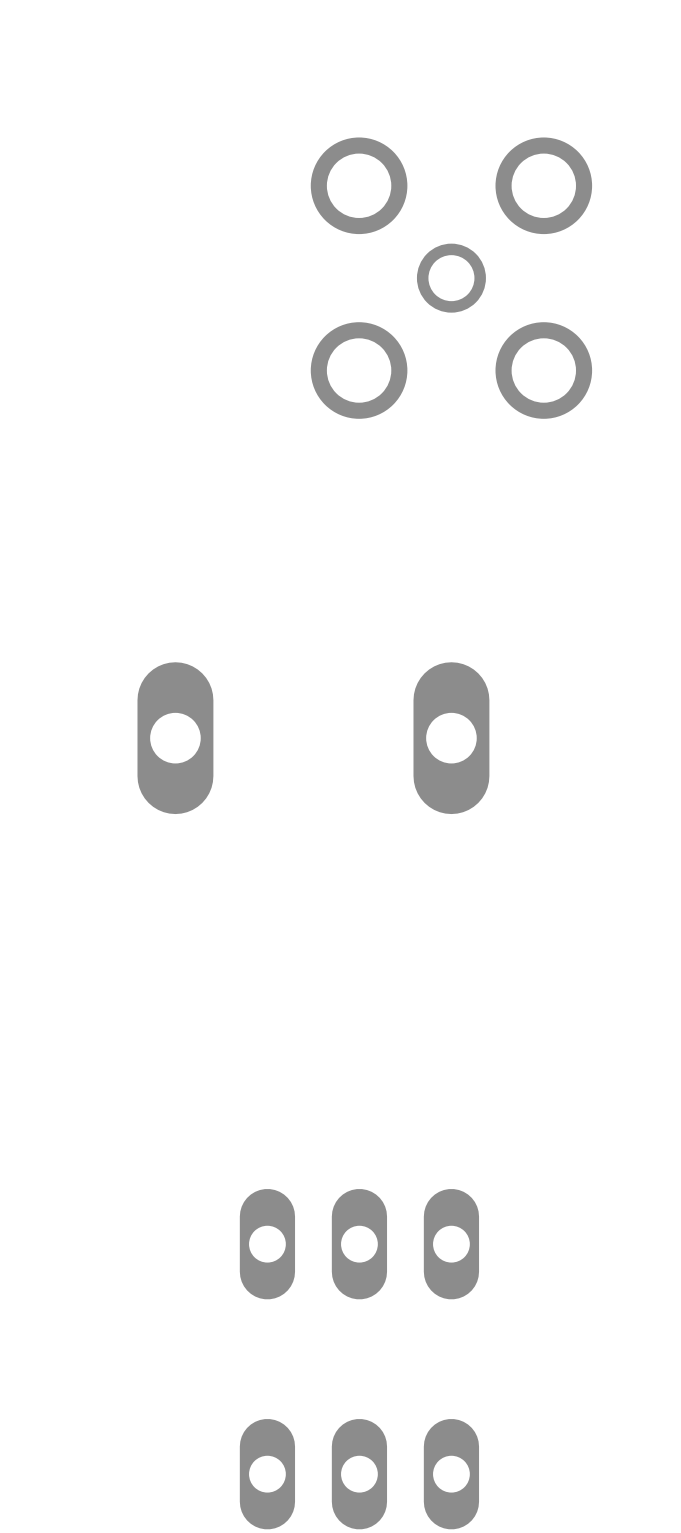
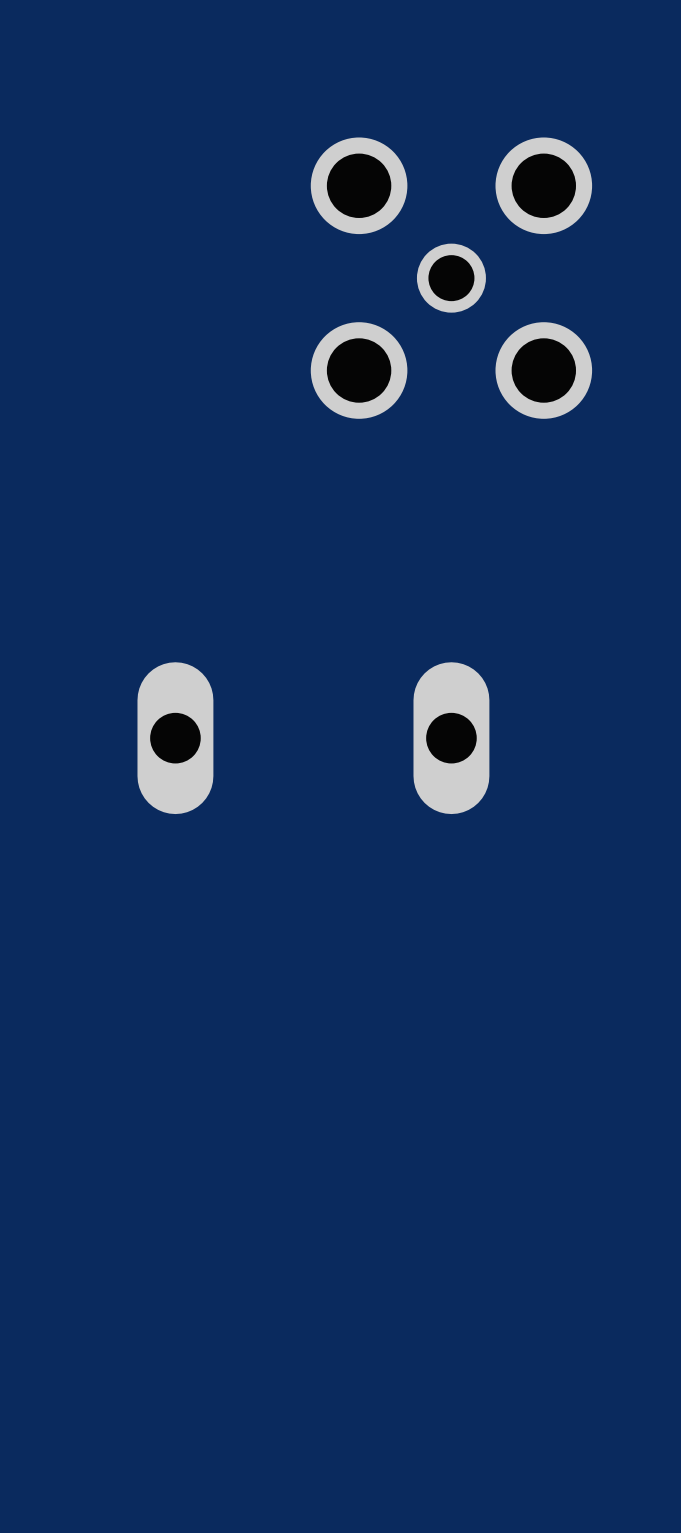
part: (359, 1244) -> none
part: (359, 1474) -> none

